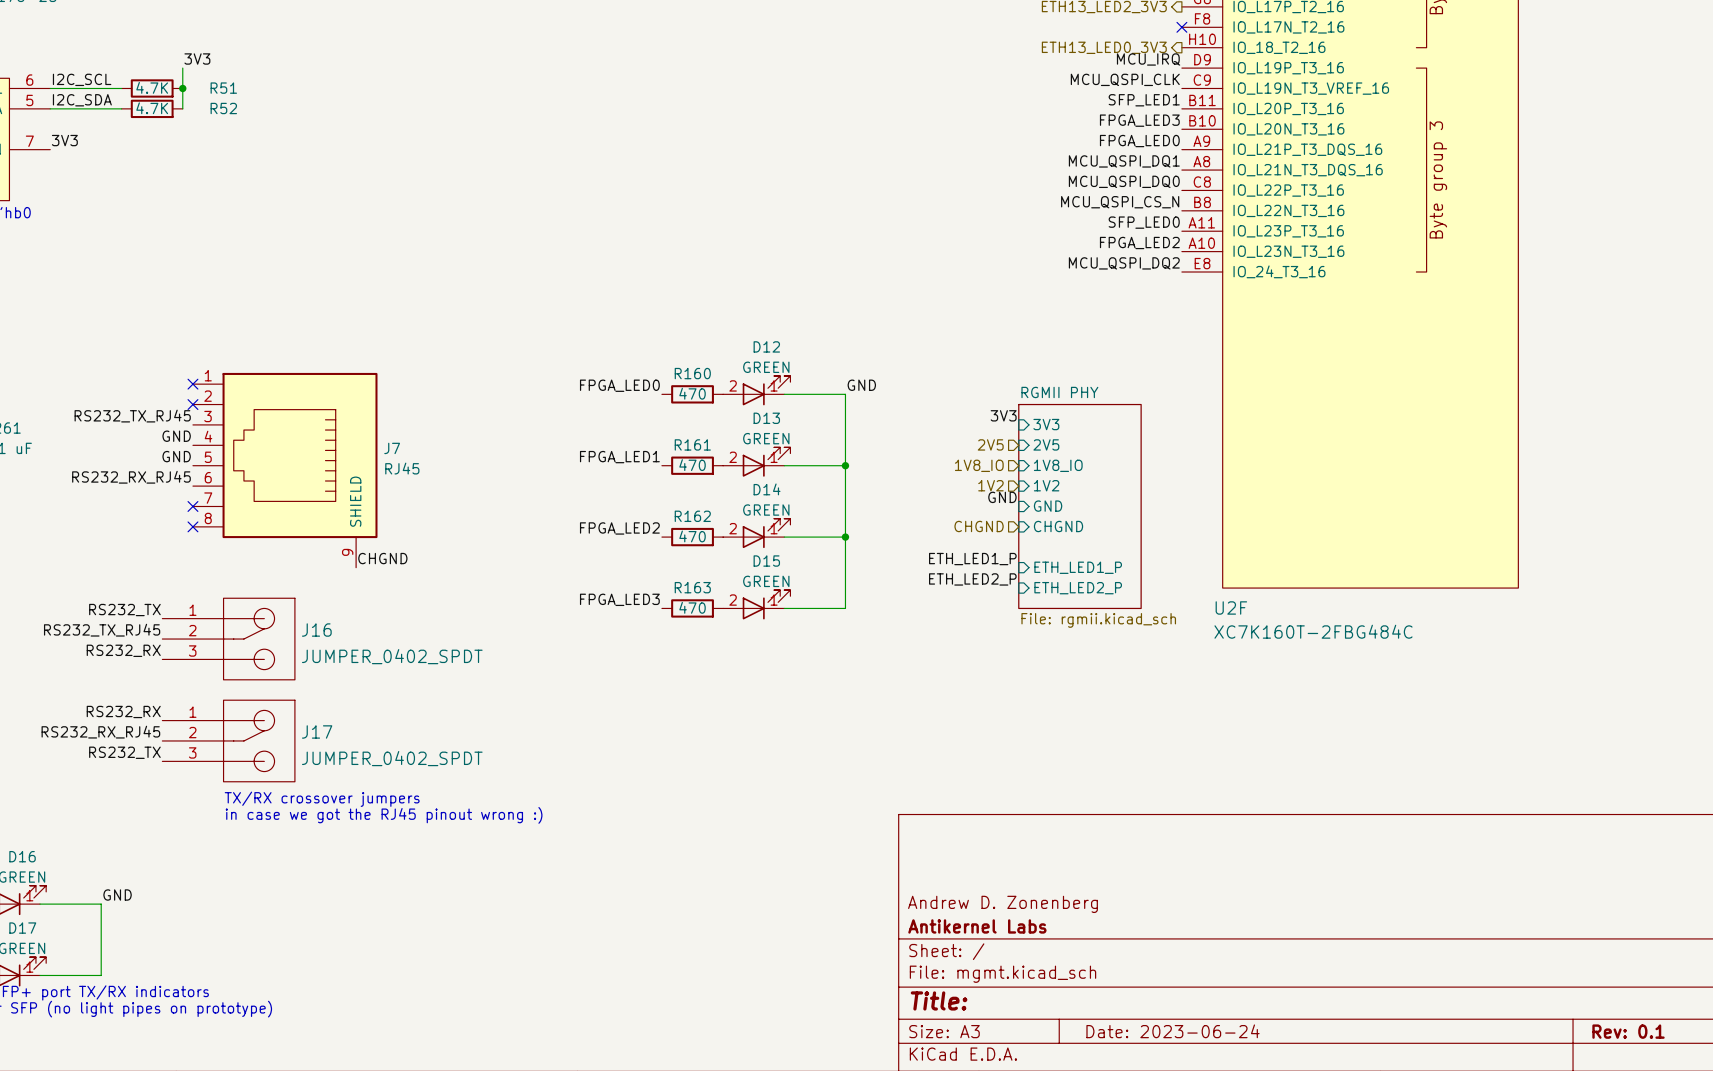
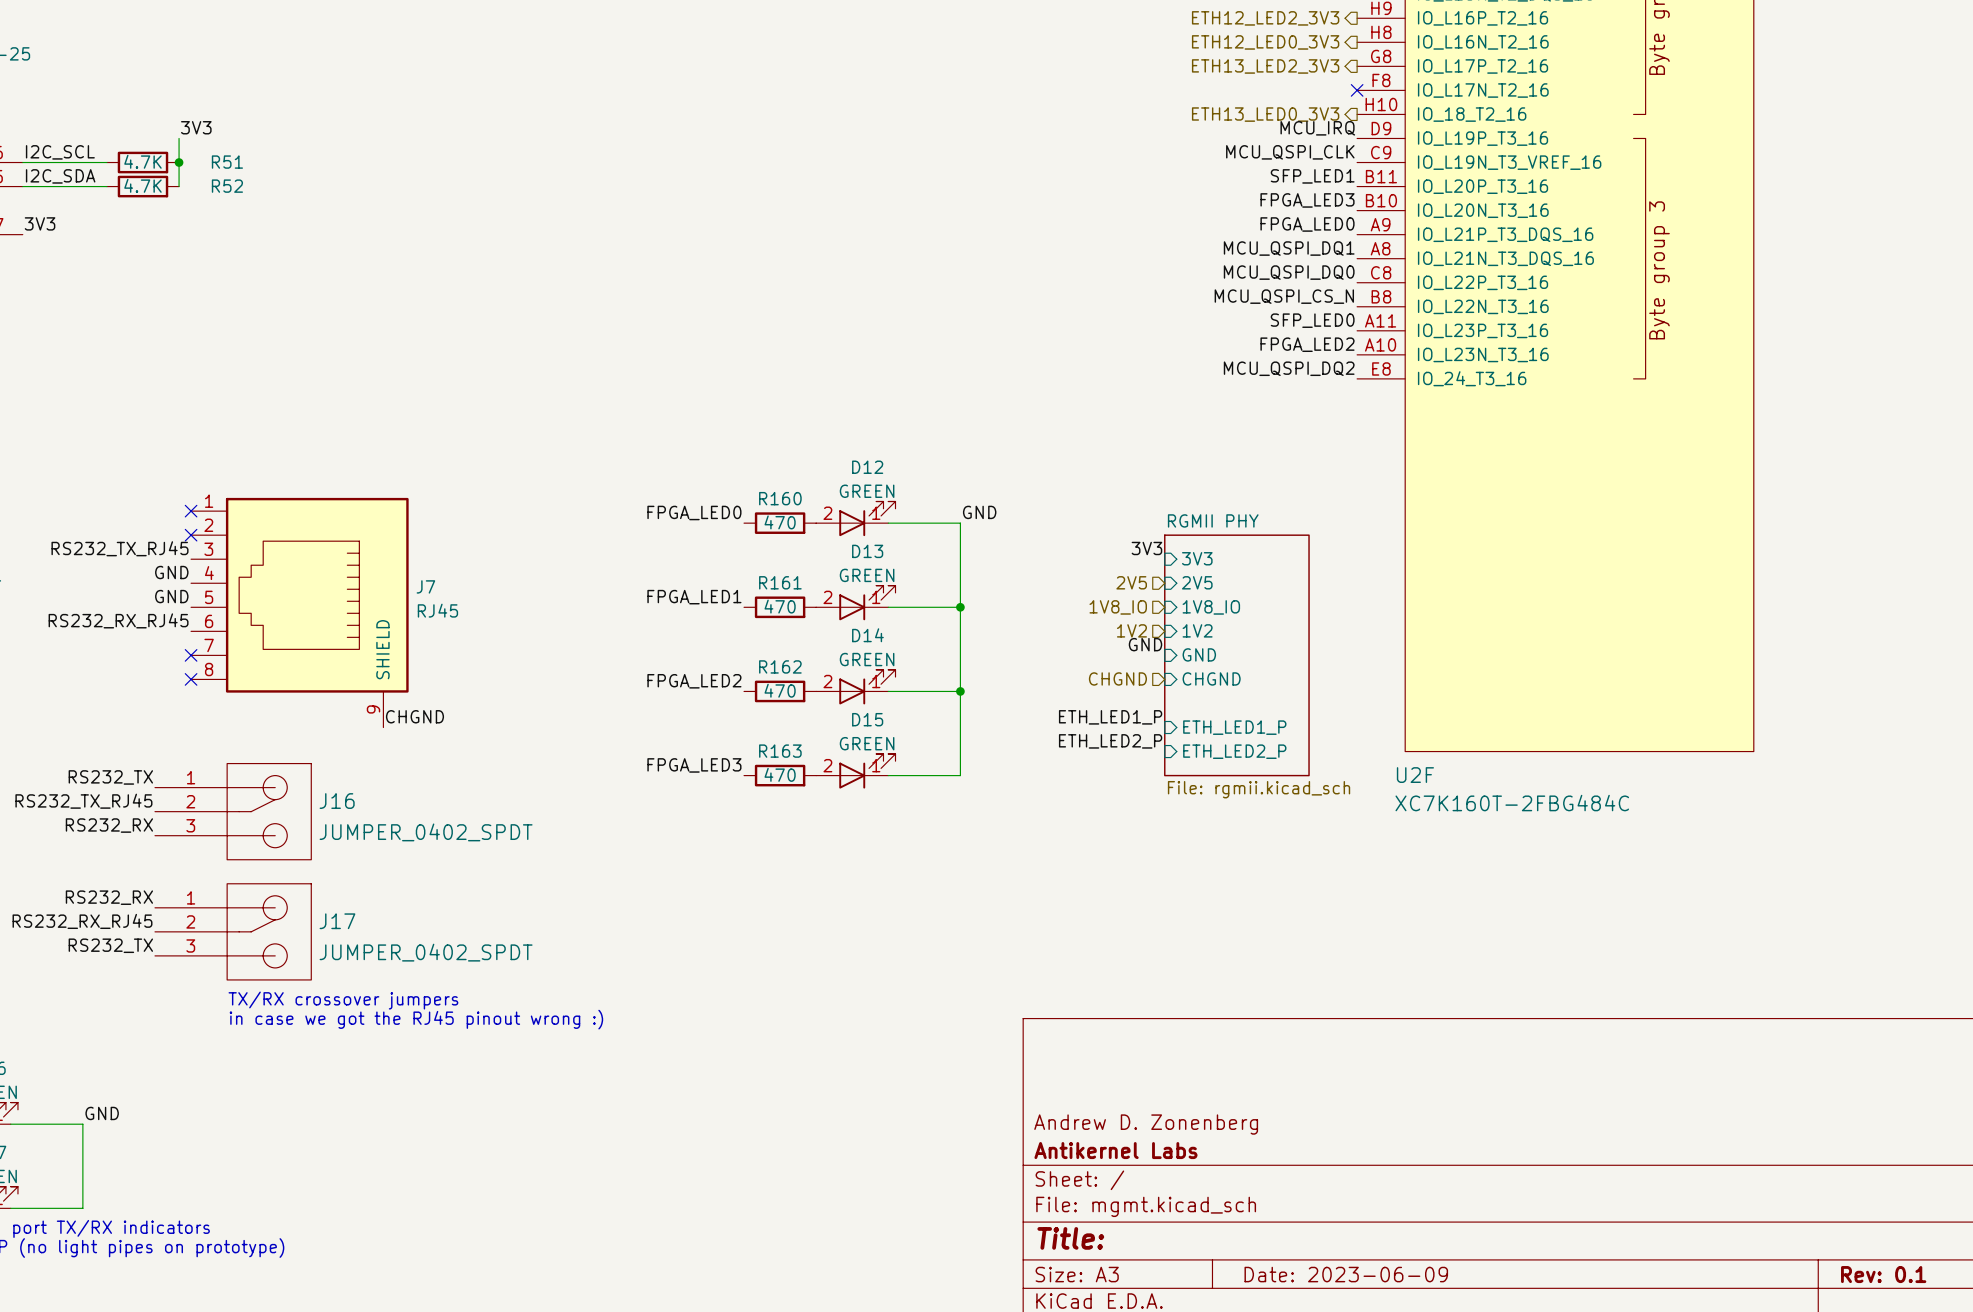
title block: Date: 2023-06-24 (1173, 1031) -> Date: 2023-06-09 (1346, 1274)

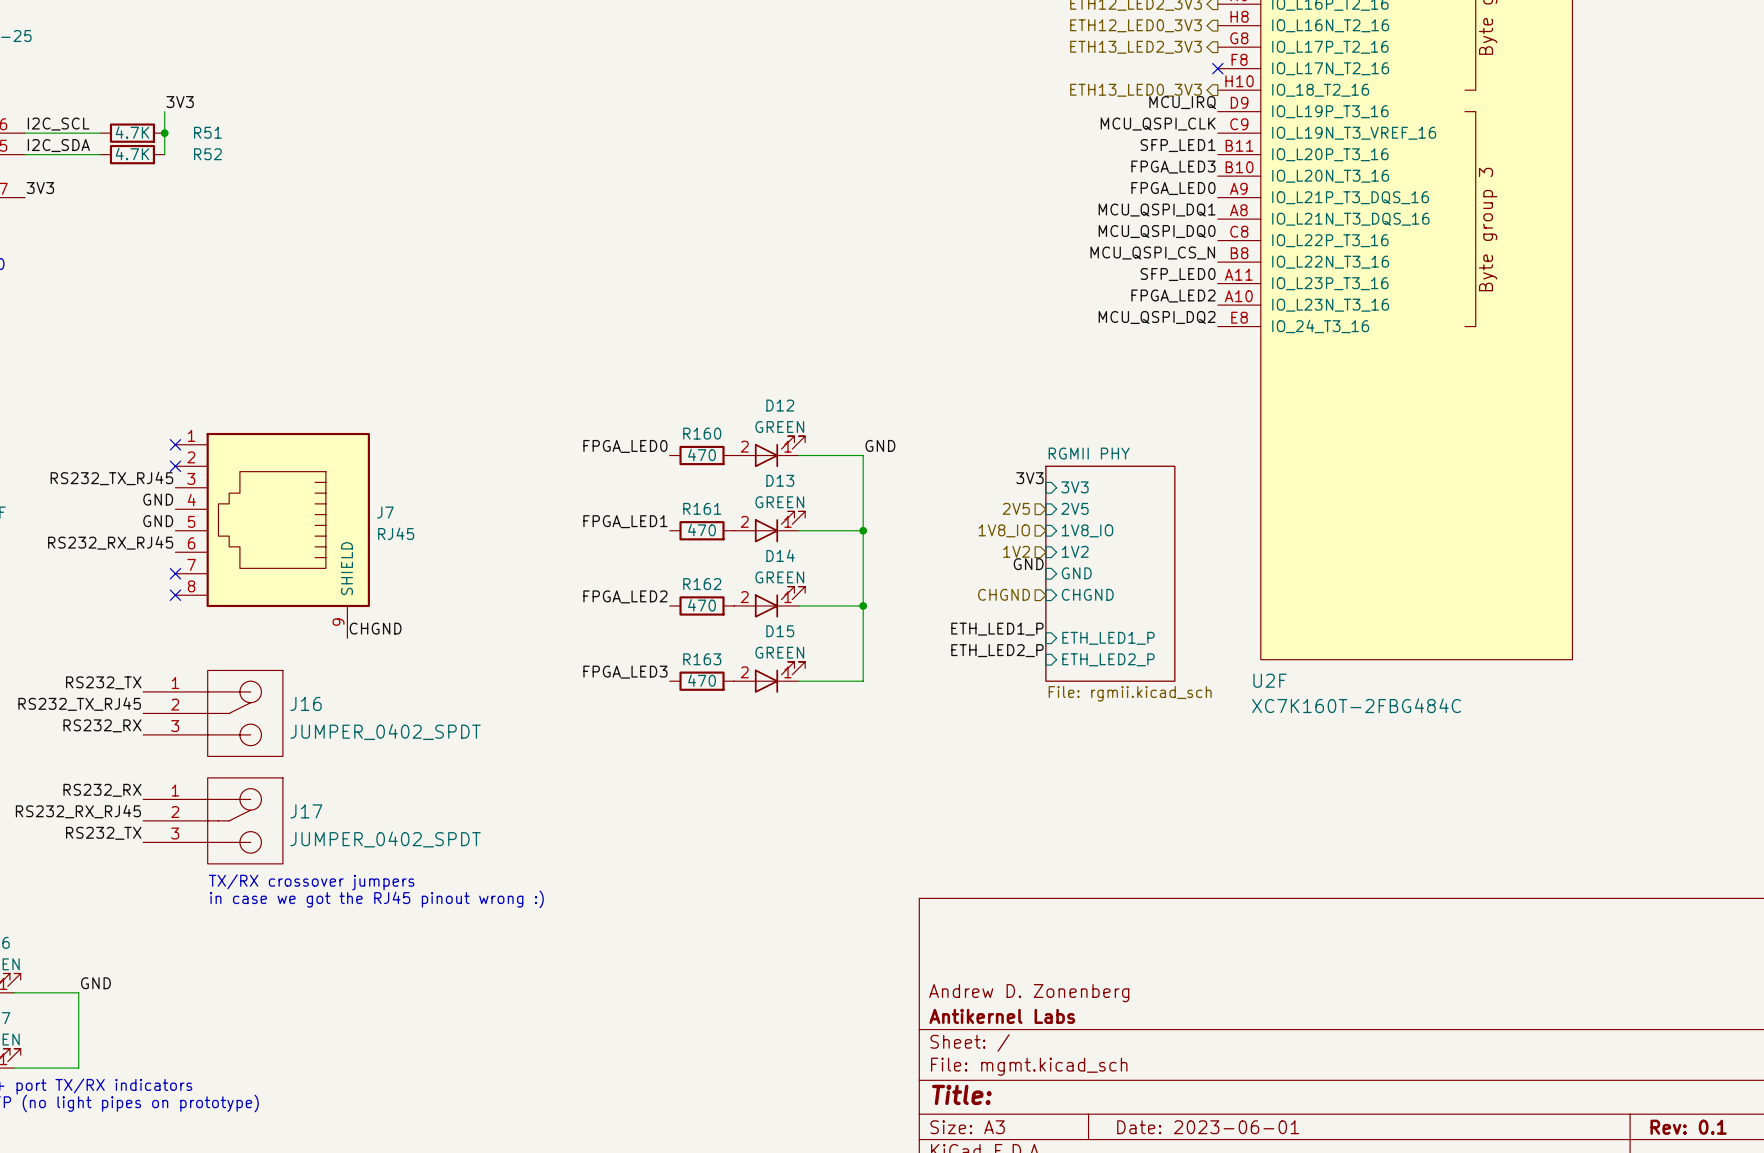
title block: Date: 2023-06-09 (1346, 1274) -> Date: 2023-06-01 (1208, 1127)

